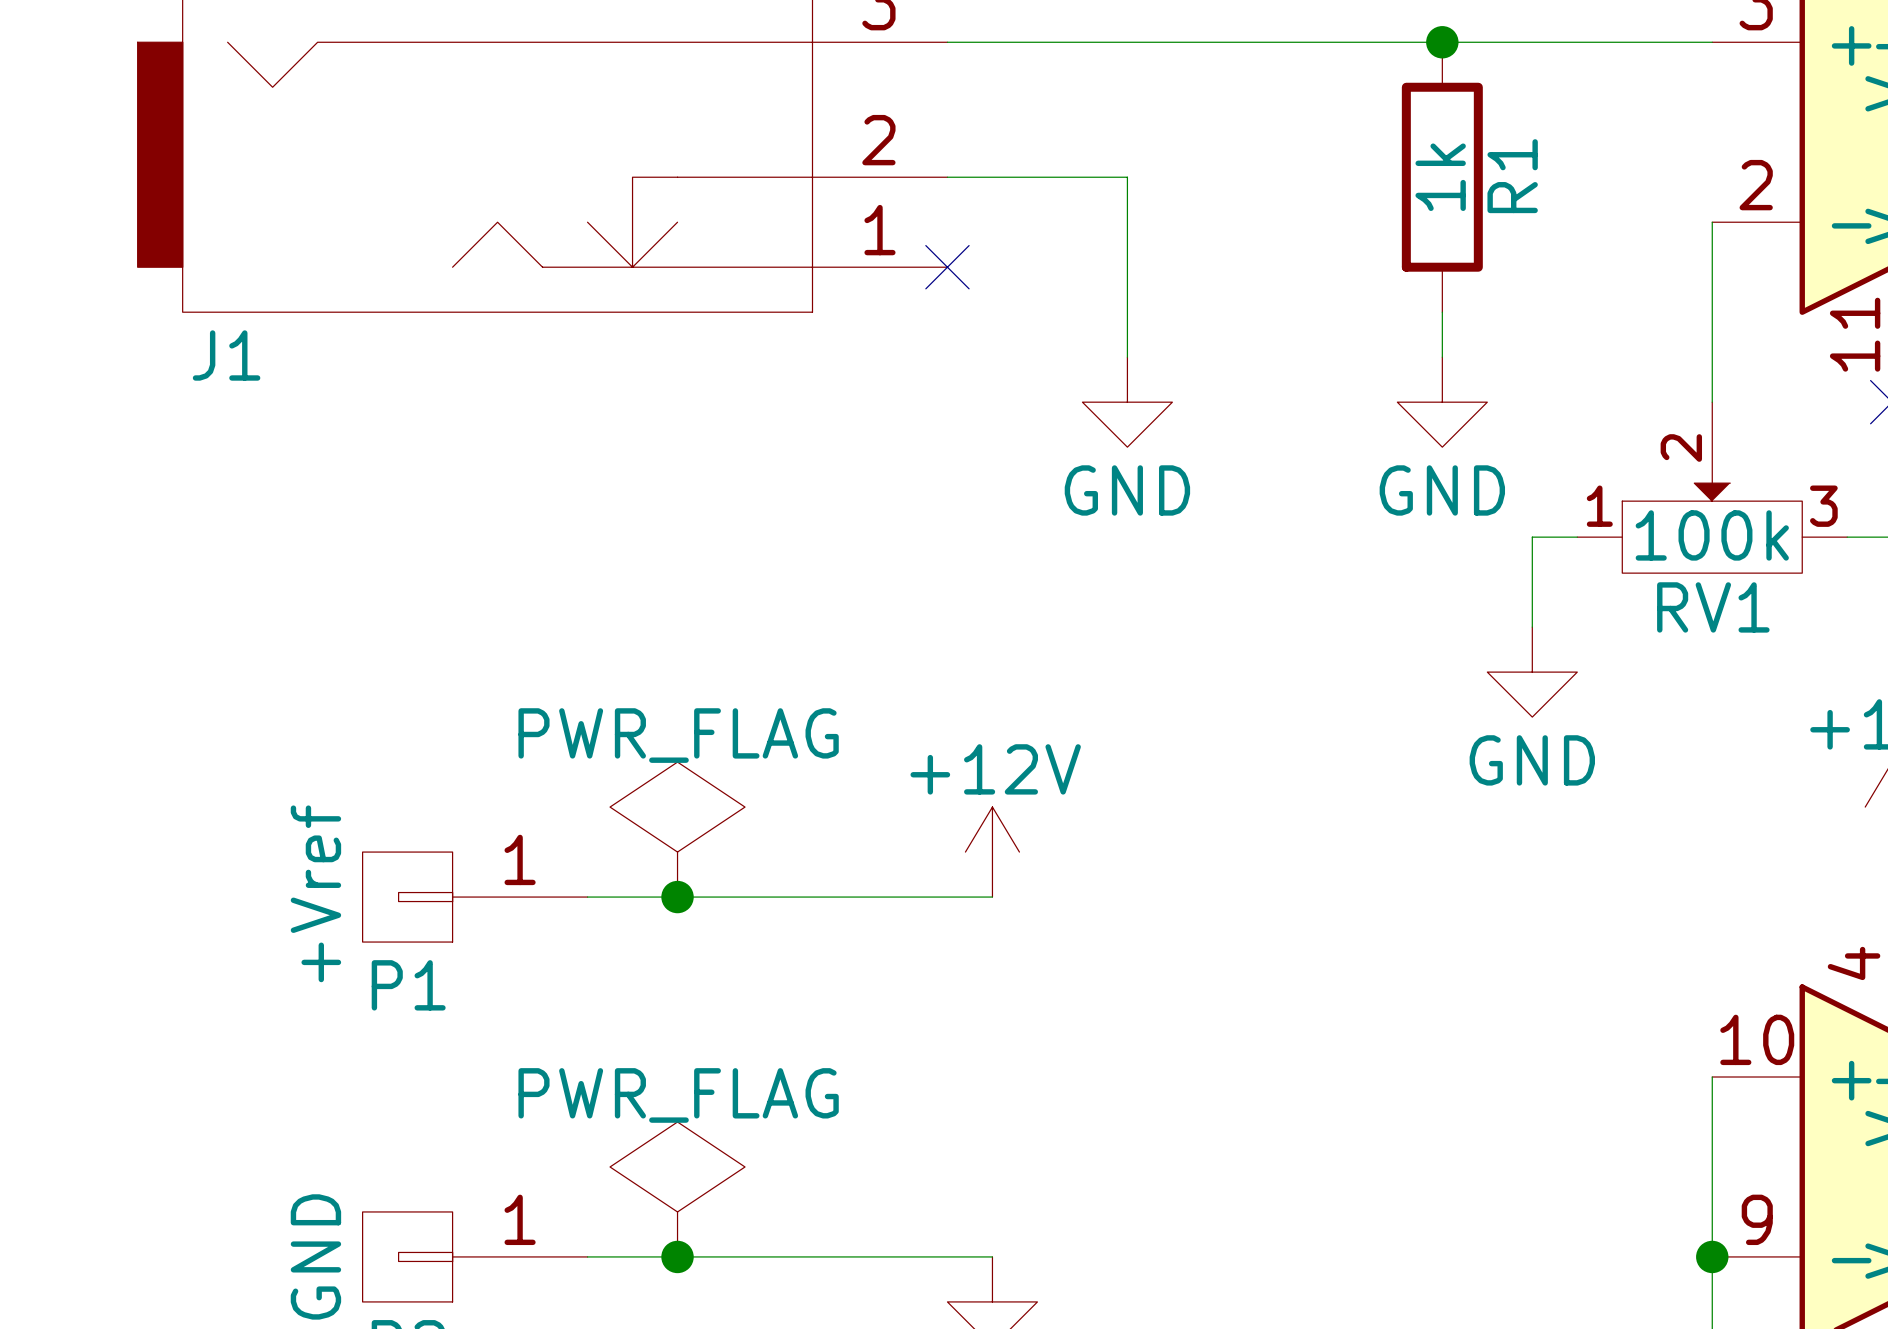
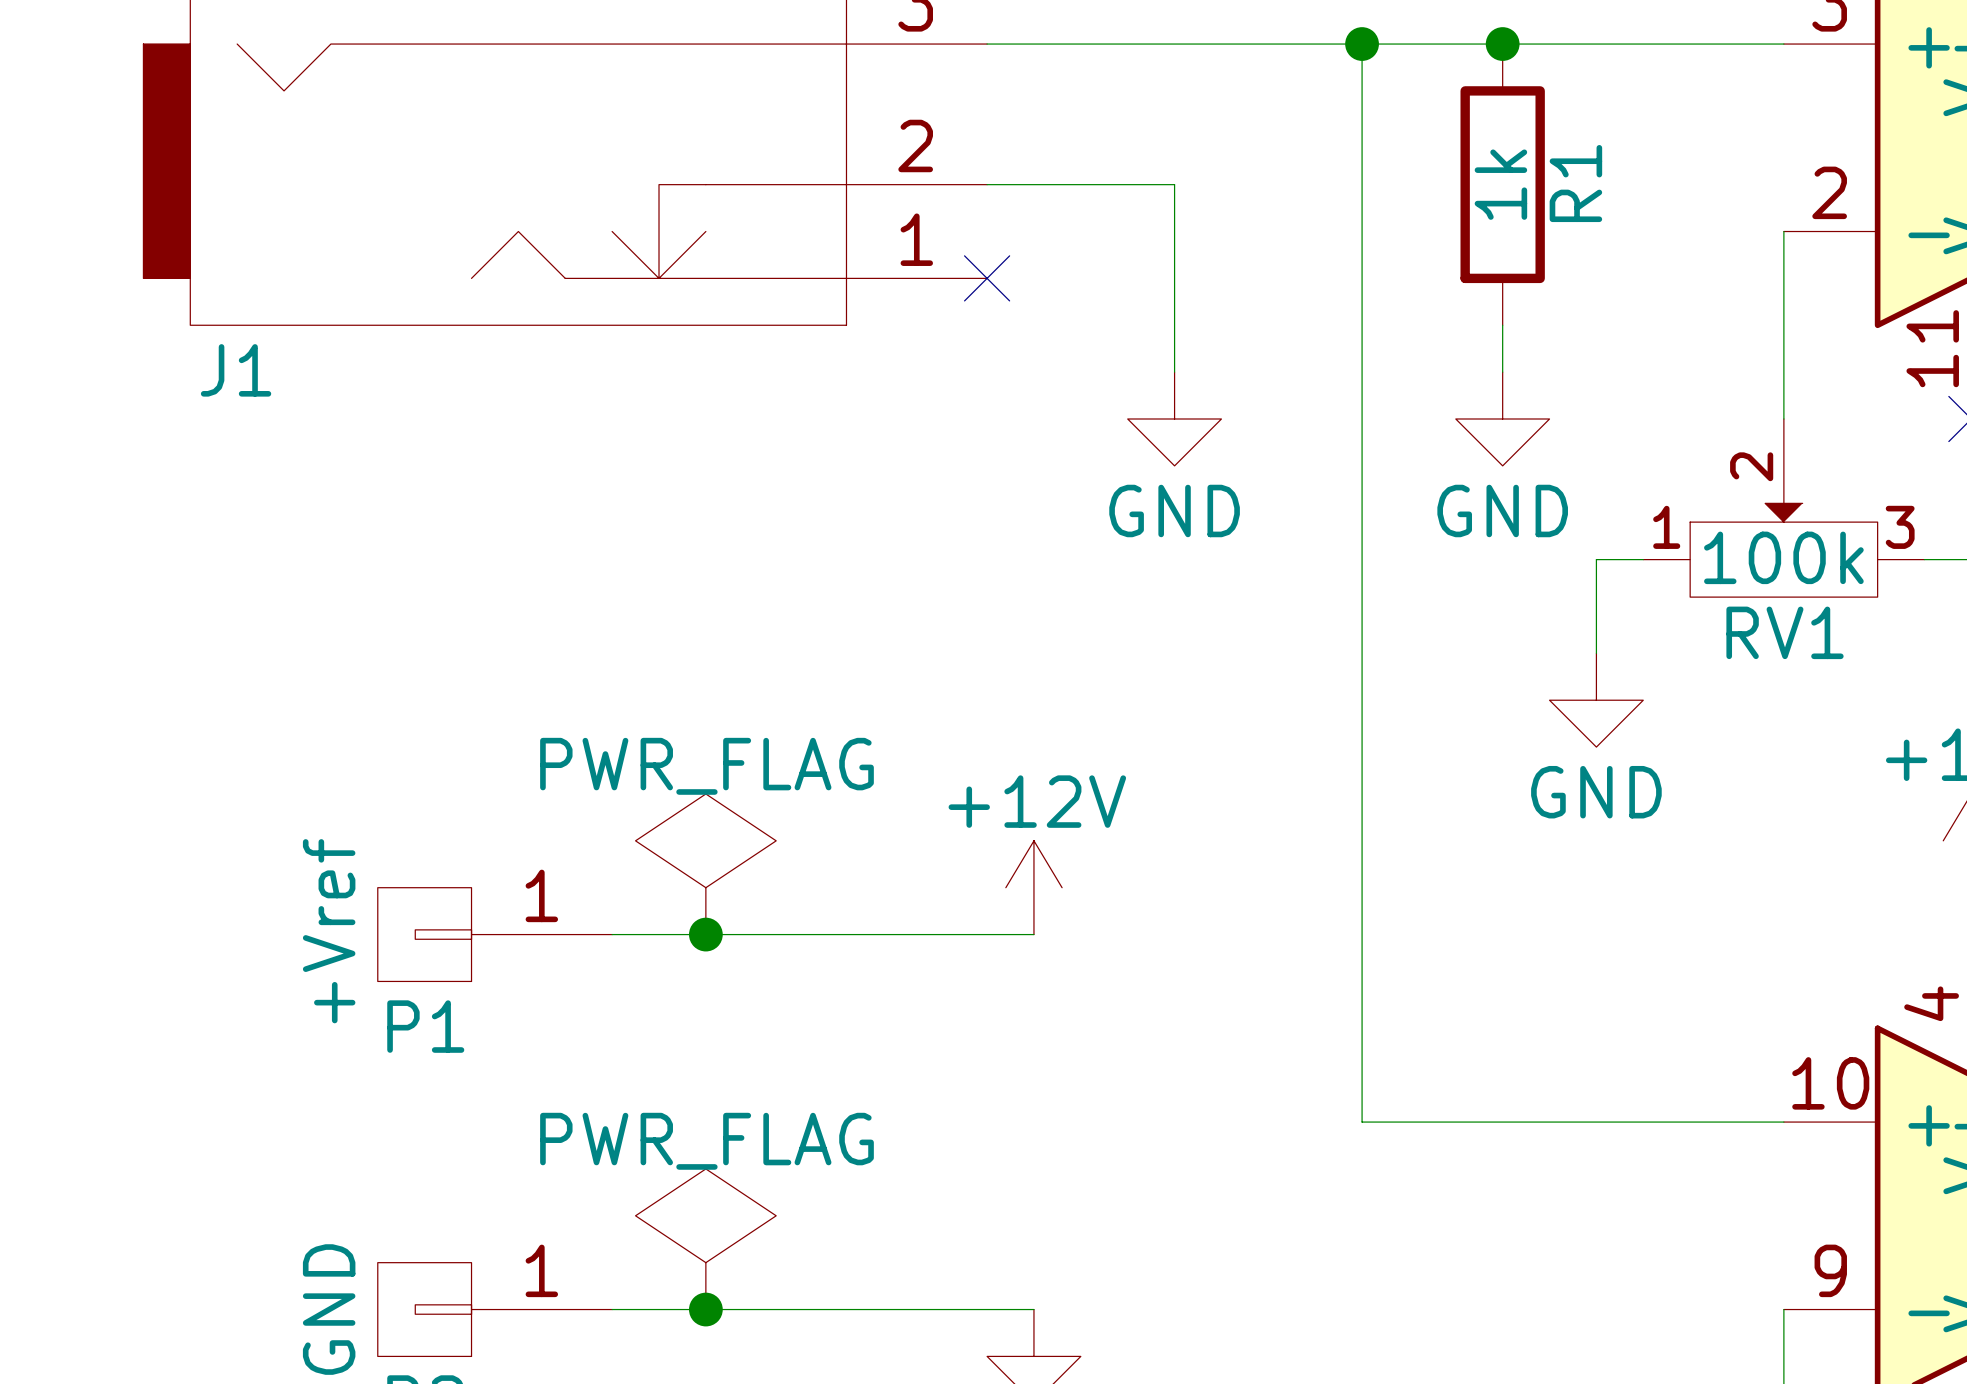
junction: none -> (1362, 44)
wire: (1712, 1077) (1712, 1256) -> (1783, 1122) (1362, 1122) (1362, 44)
junction: (1712, 1256) -> none

